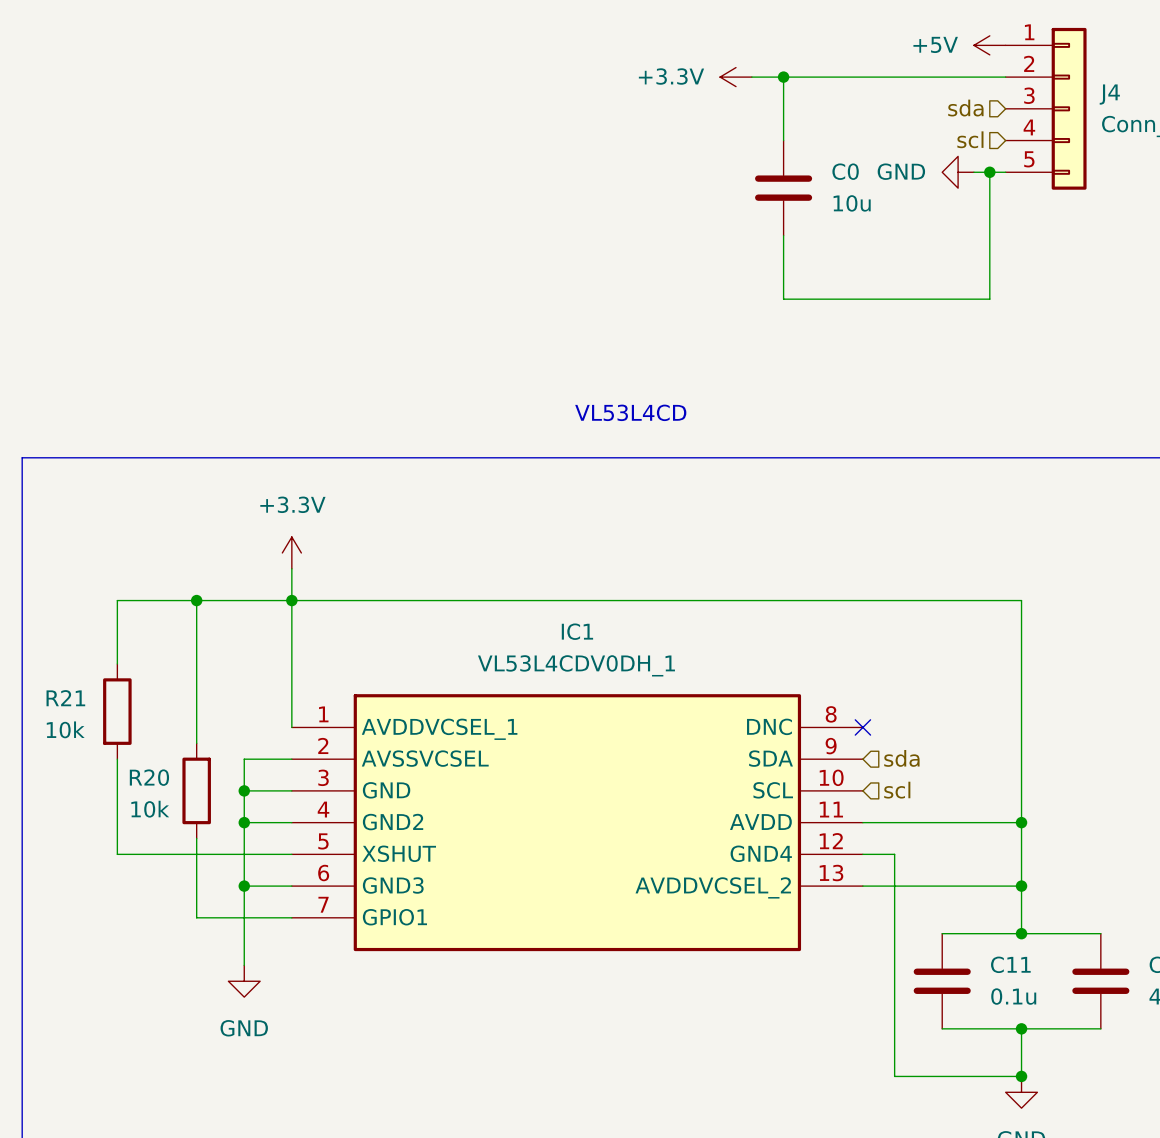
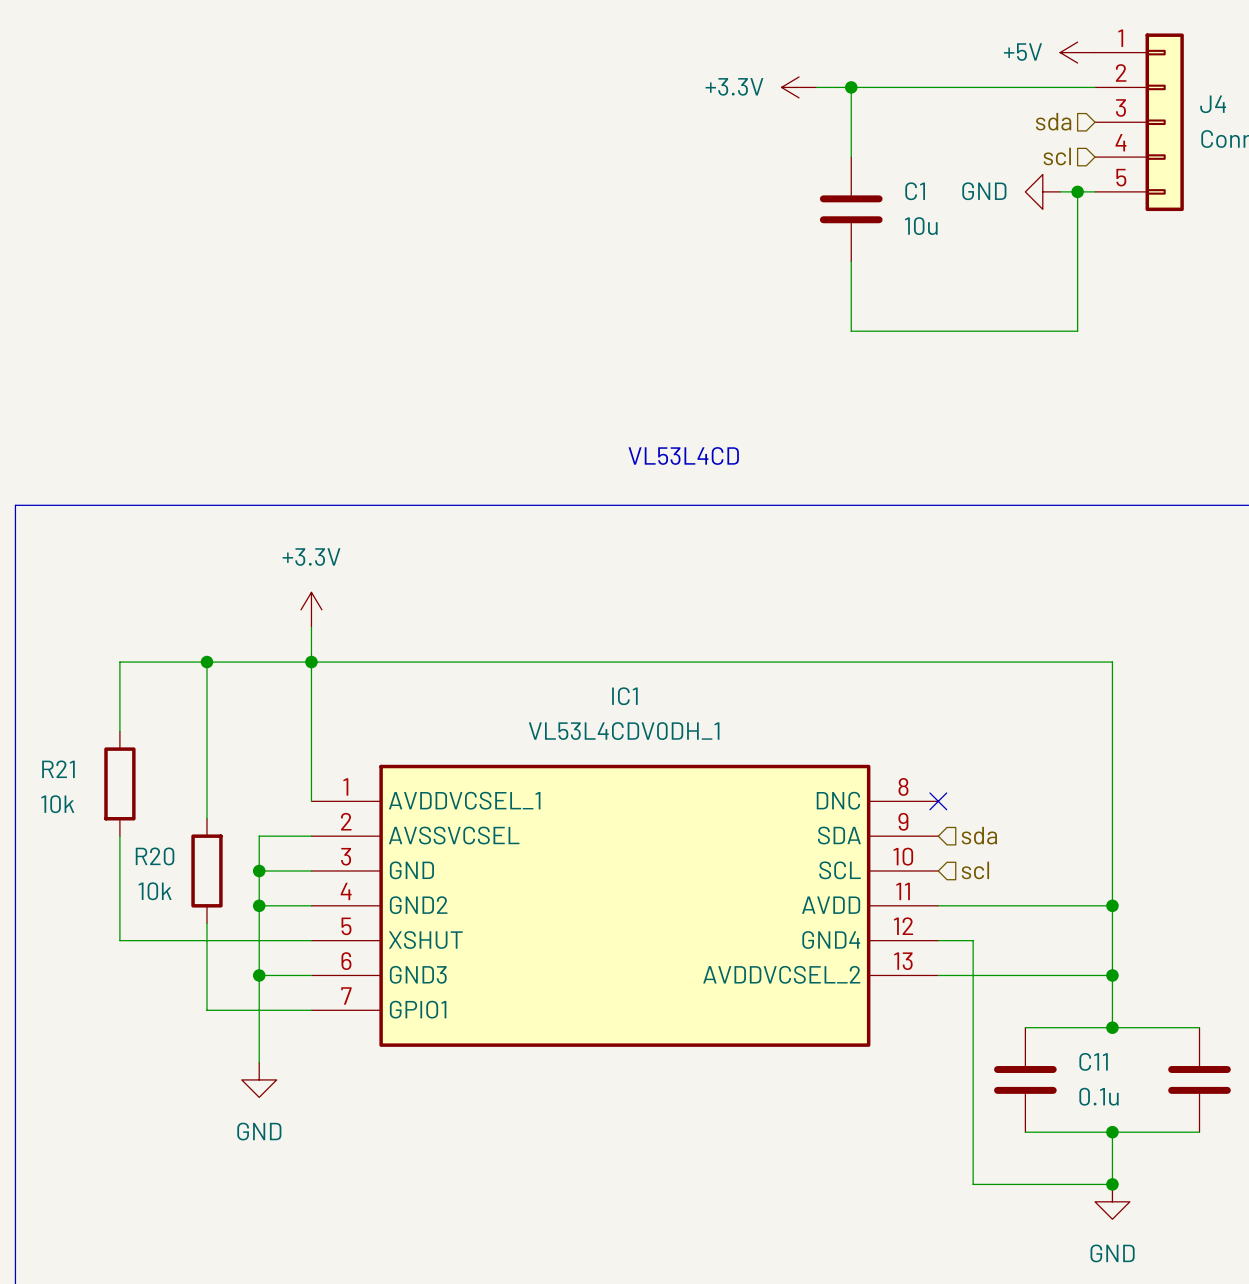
C0 name: C0 (845, 171) -> C1 (915, 191)

